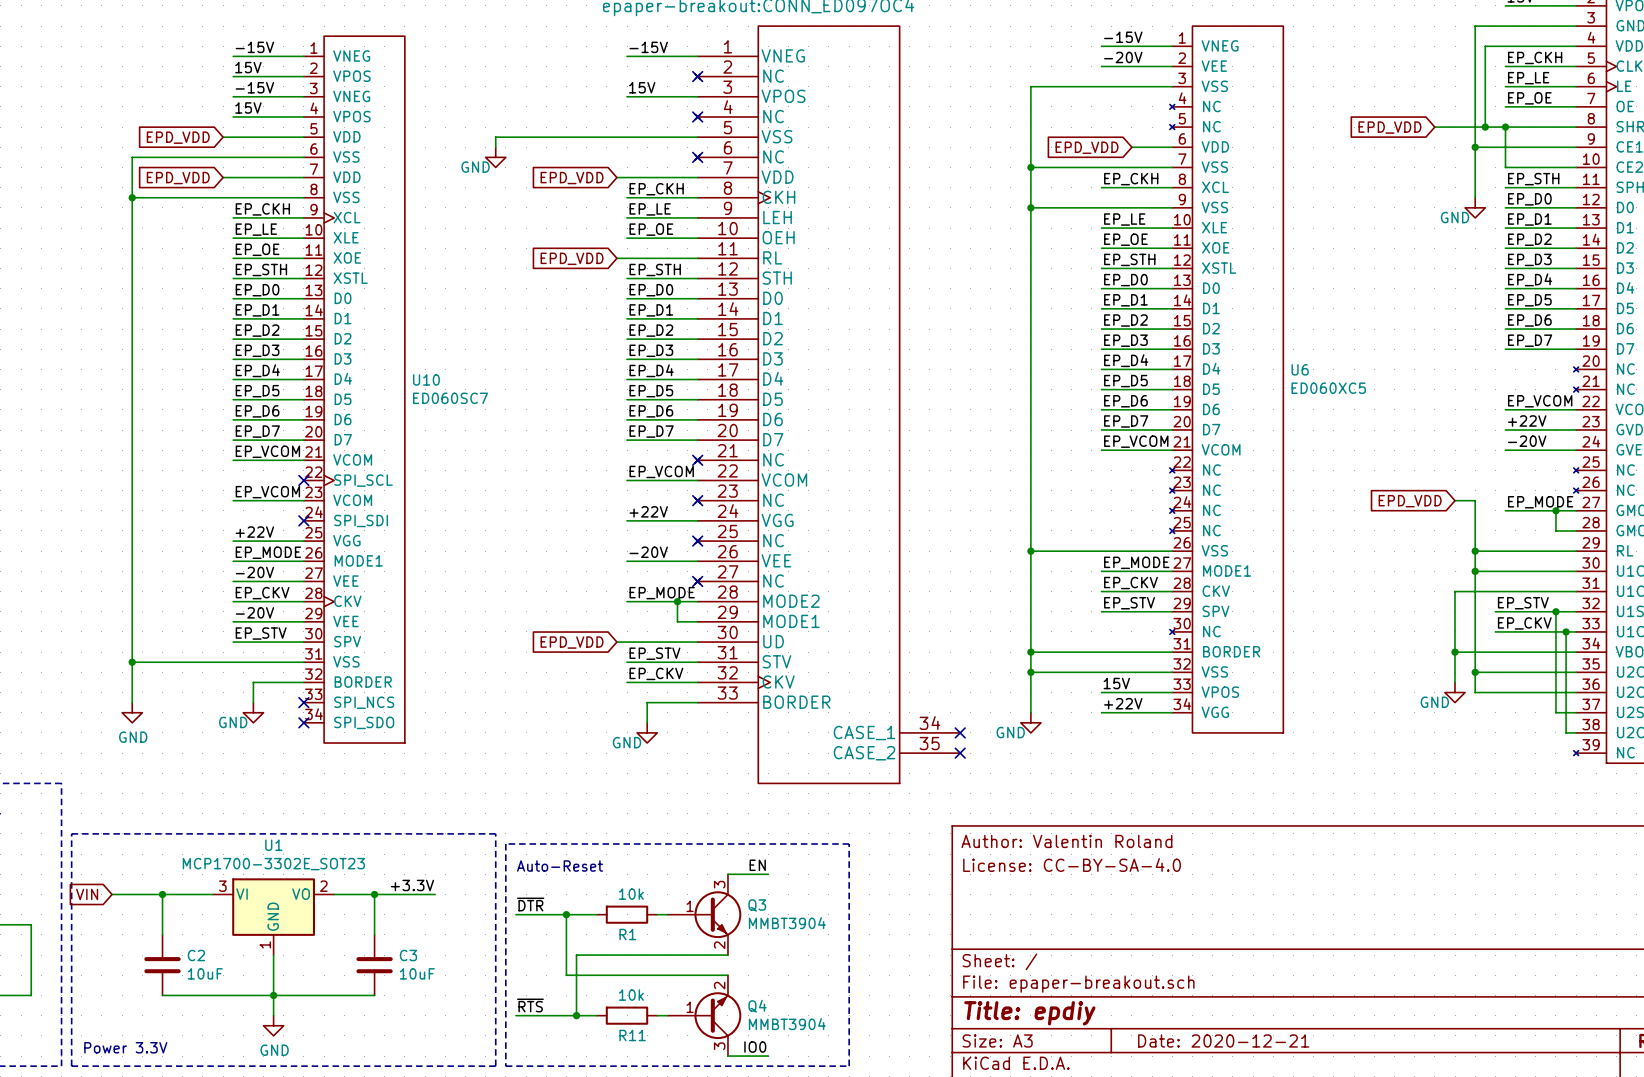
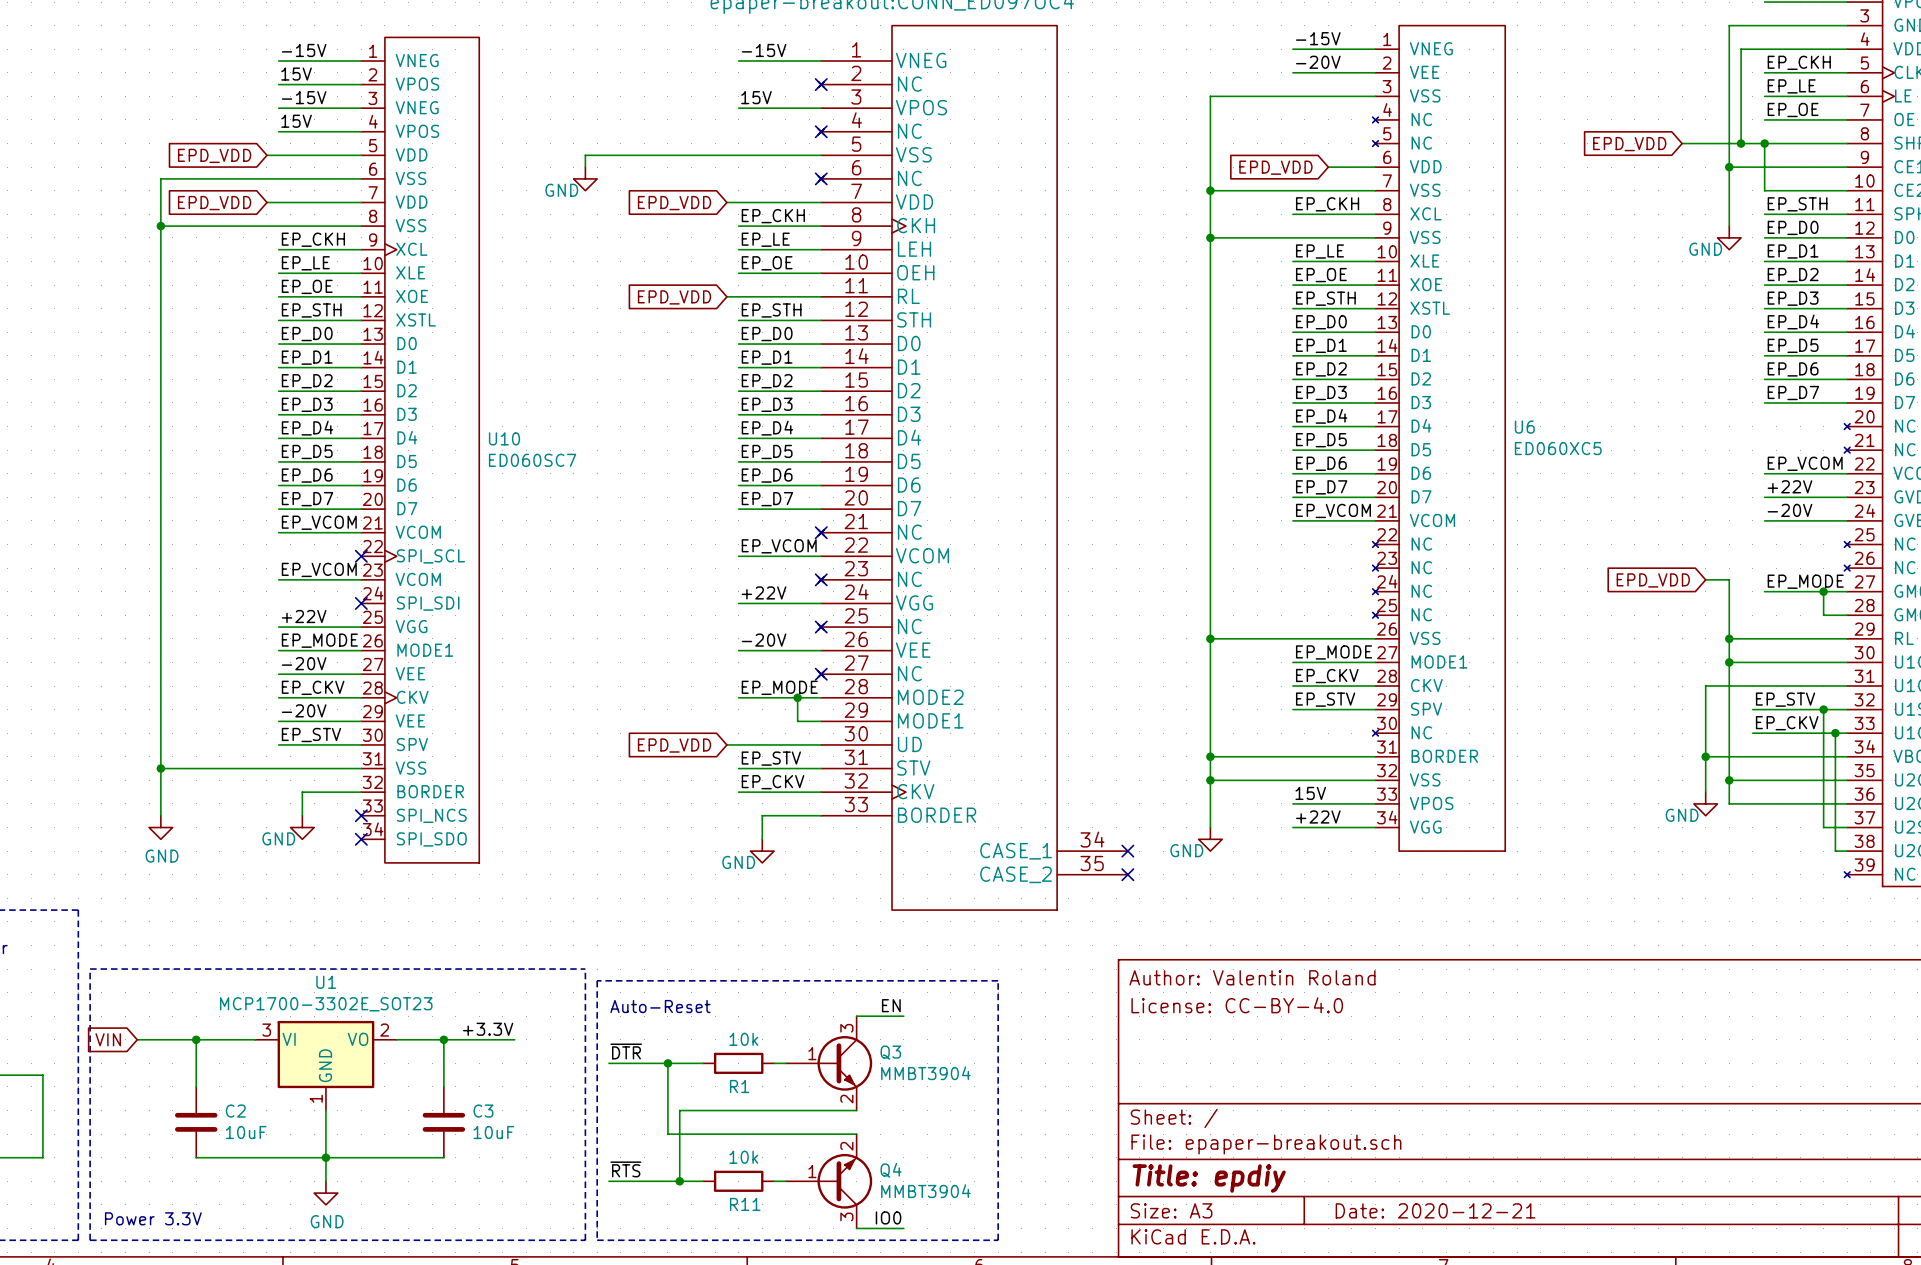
title block: License: CC-BY-SA-4.0 (1072, 864) -> License: CC-BY-4.0 (1237, 1005)

